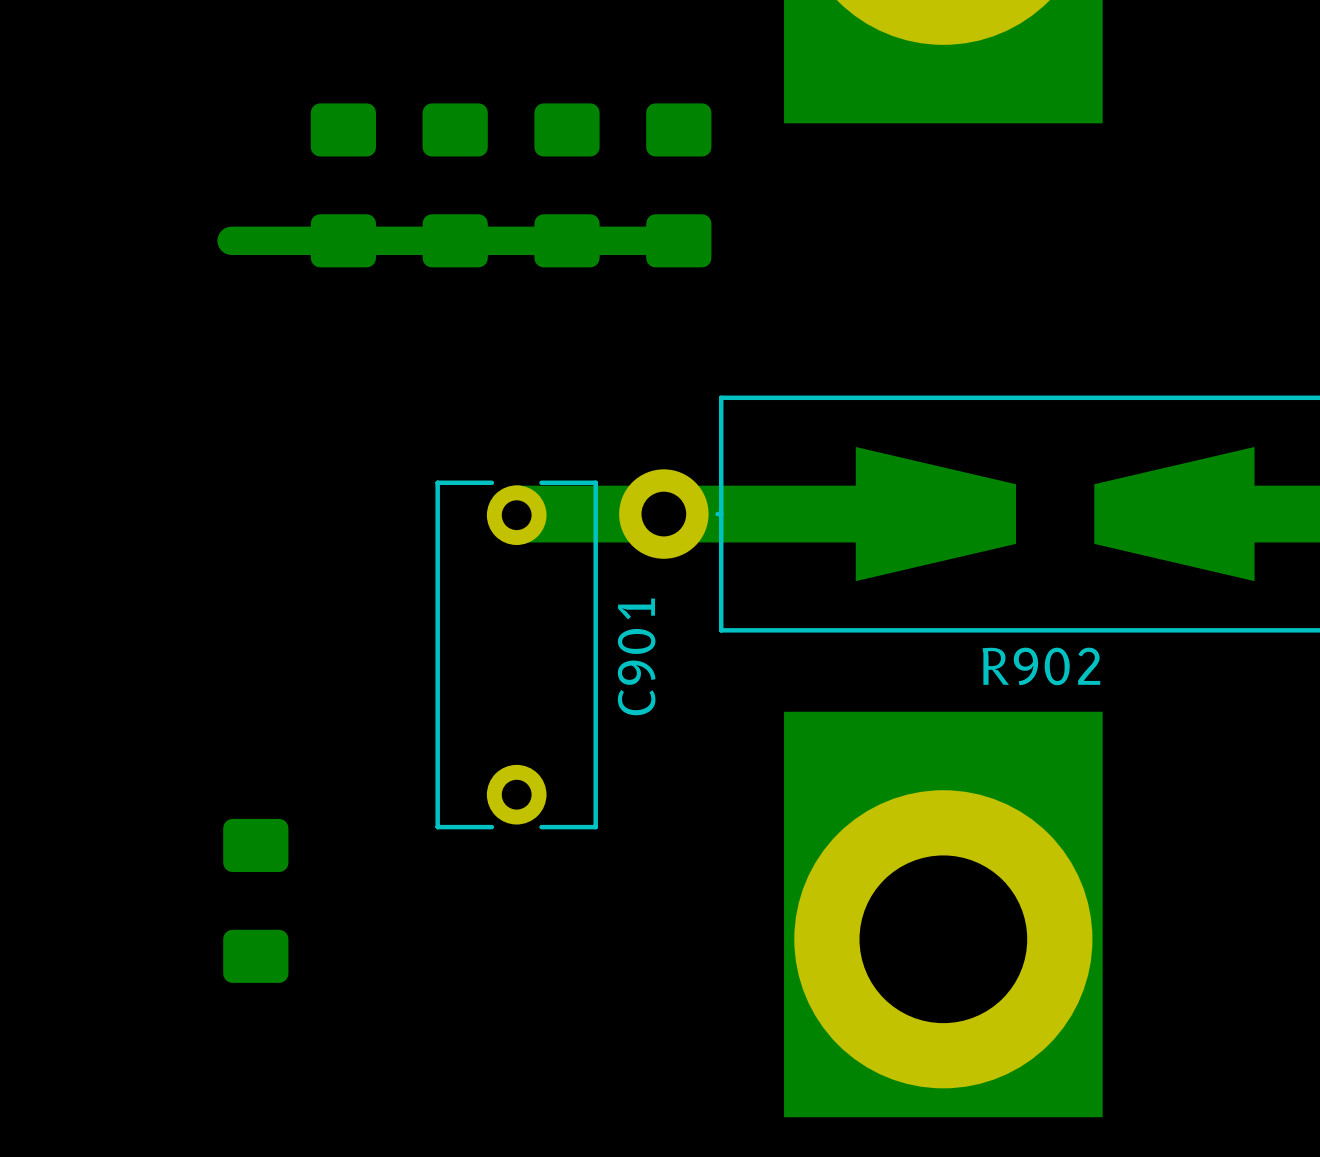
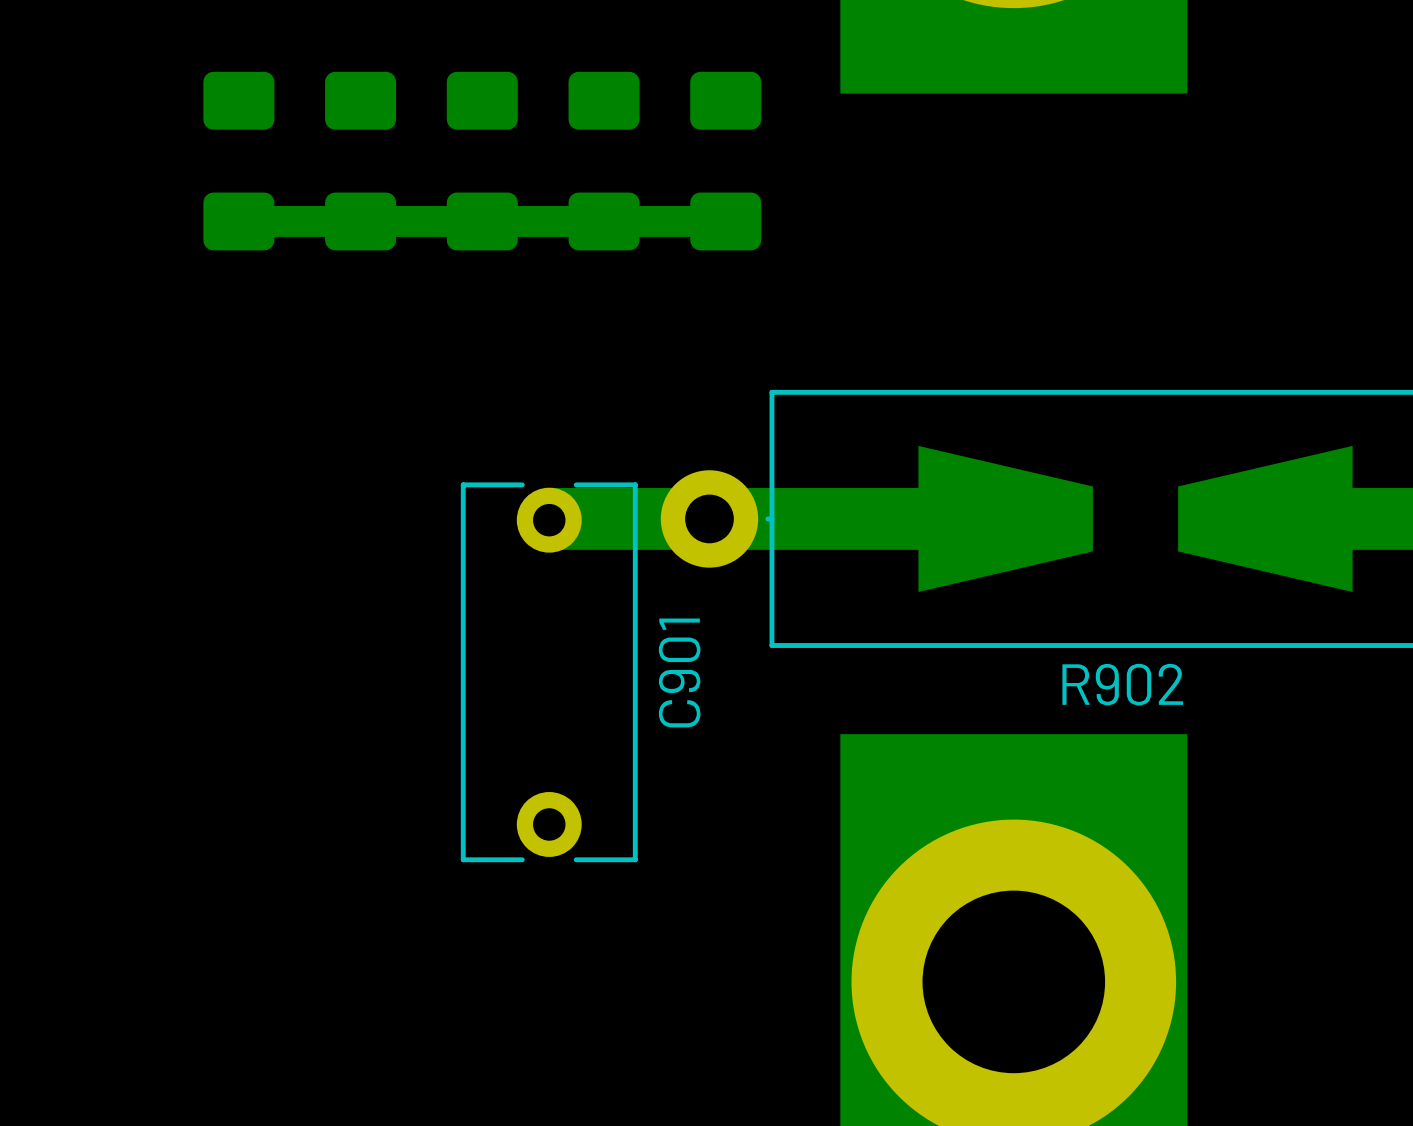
part position: (255, 900) -> (238, 161)

